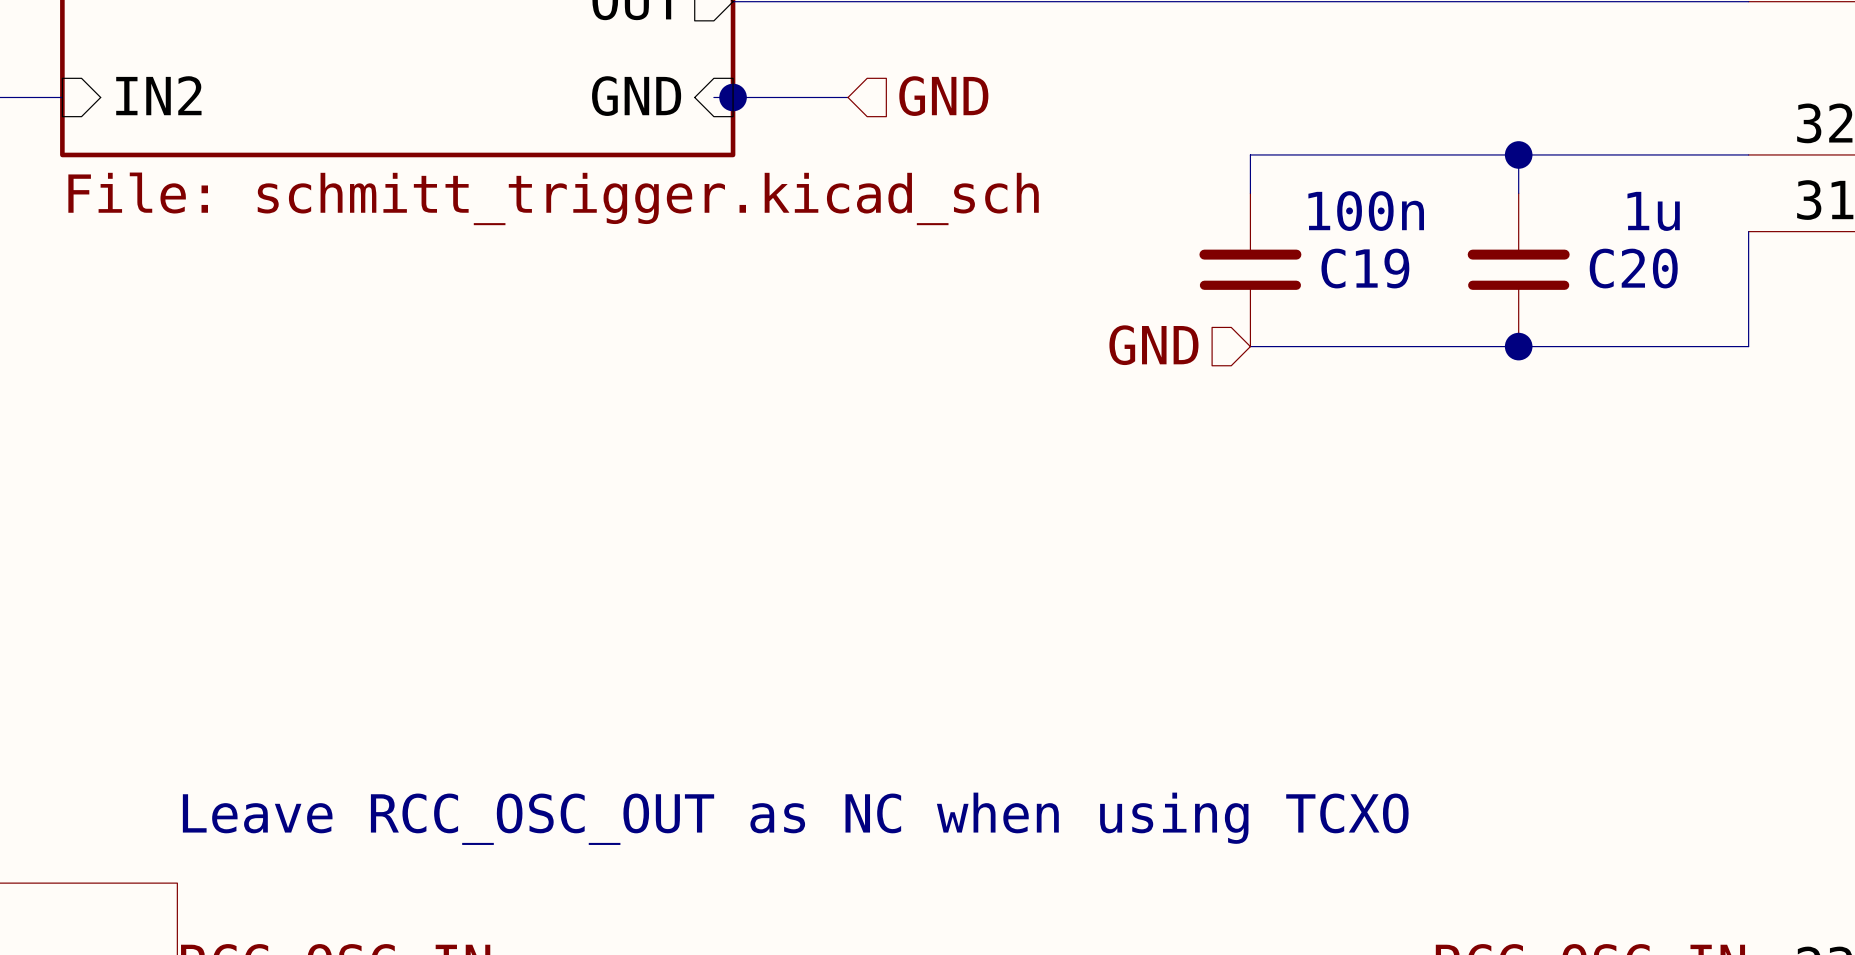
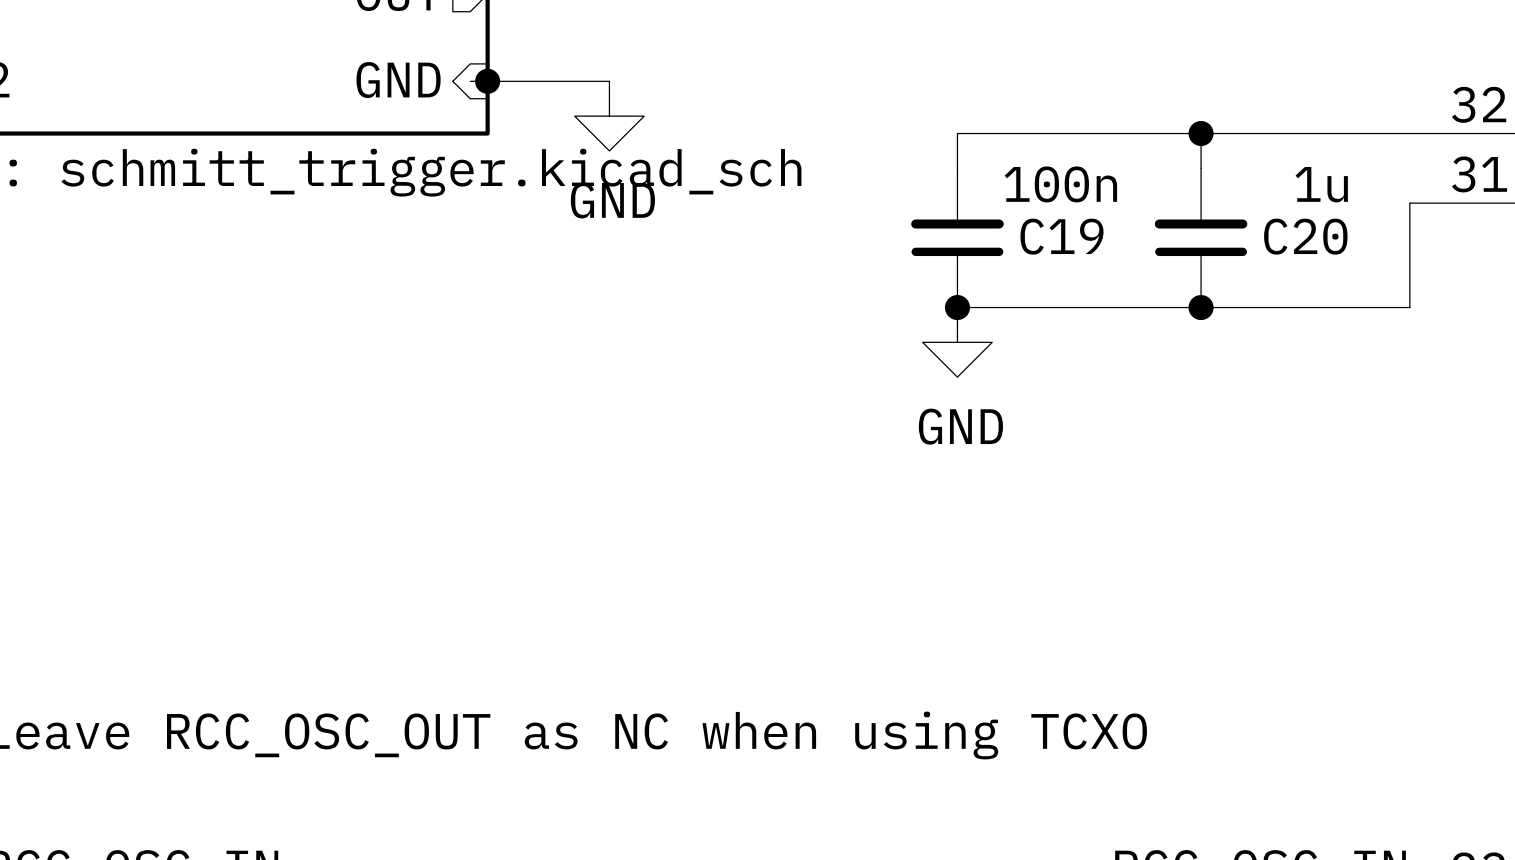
hierarchical label: GND (943, 96) -> none
wire: none -> (592, 81) (609, 81)
power symbol: none -> GND (609, 116)
hierarchical label: GND (1153, 345) -> none
junction: none -> (957, 307)
power symbol: none -> GND (957, 342)

